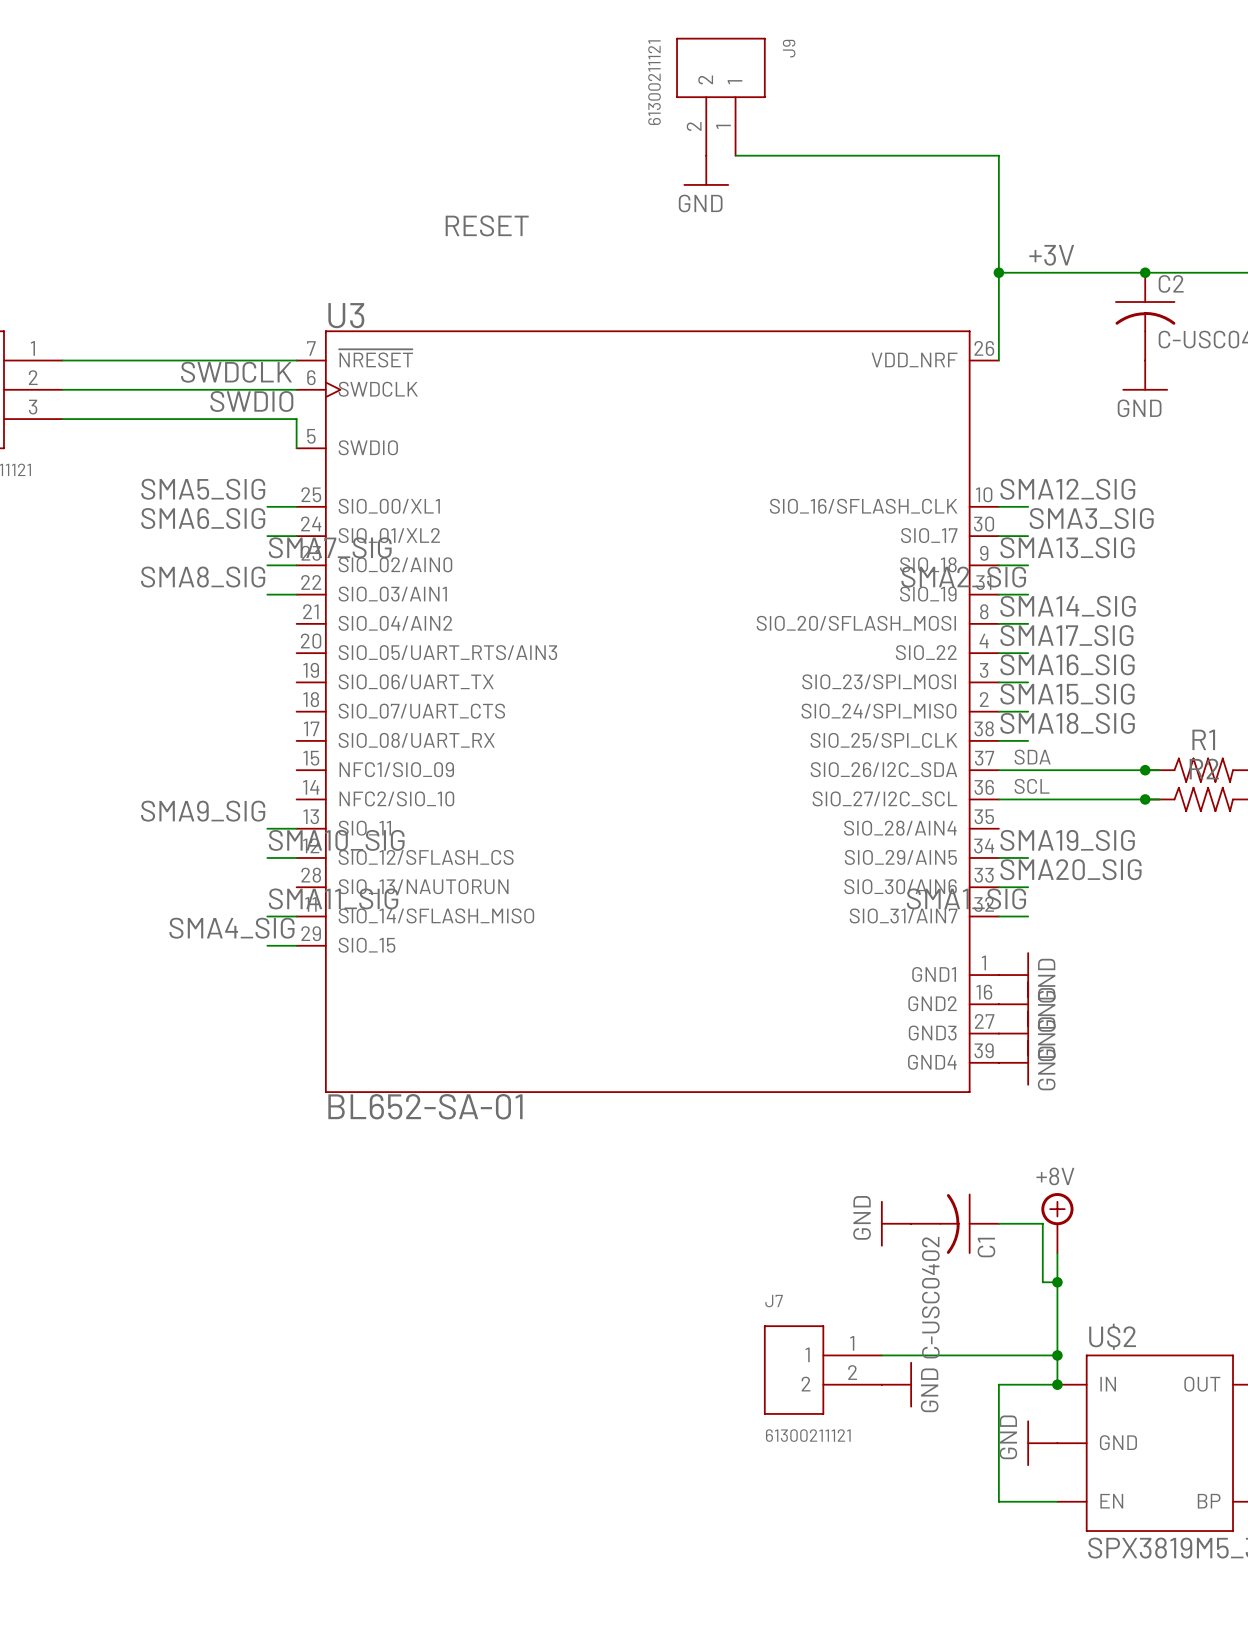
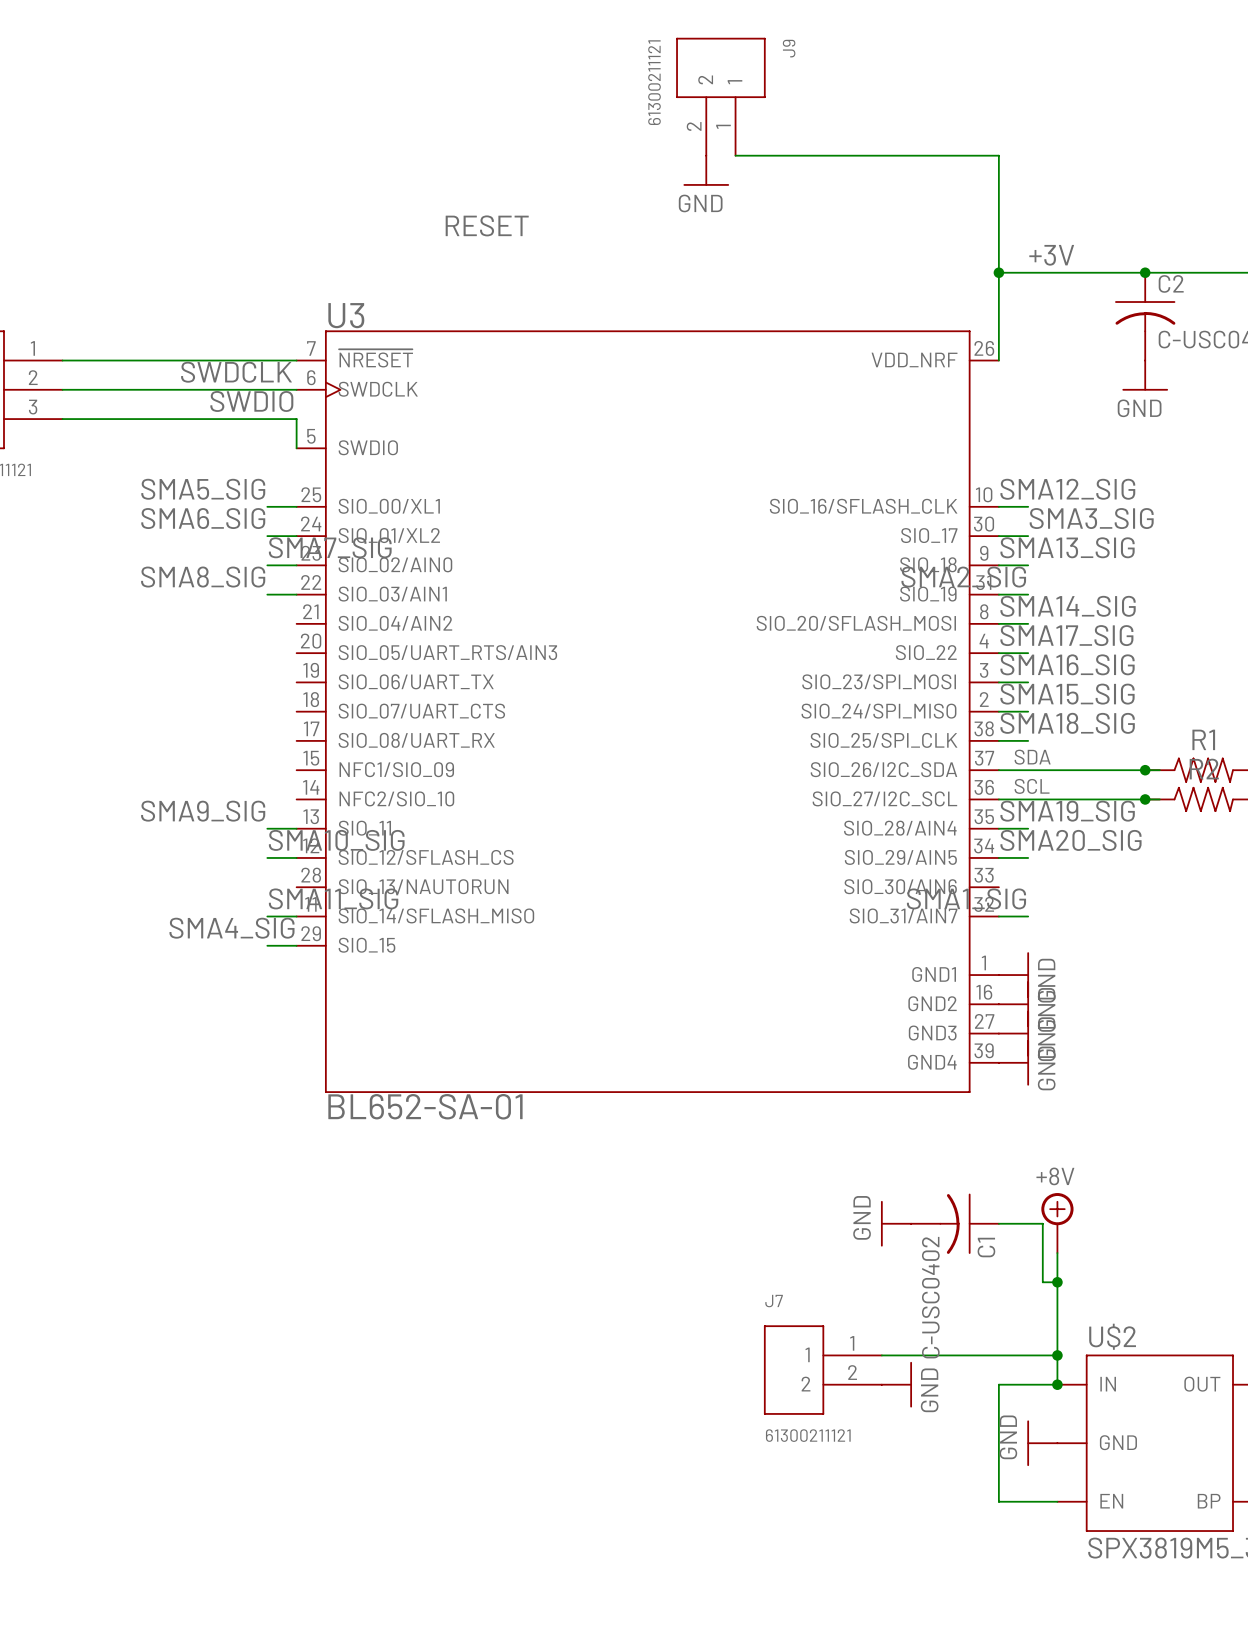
label: none -> SMA19_SIG (1067, 811)
label: SMA19_SIG (1067, 840) -> SMA20_SIG (1070, 840)
label: SMA20_SIG (1070, 869) -> none
wire: (998, 887) (1028, 887) -> (998, 828) (1028, 828)

